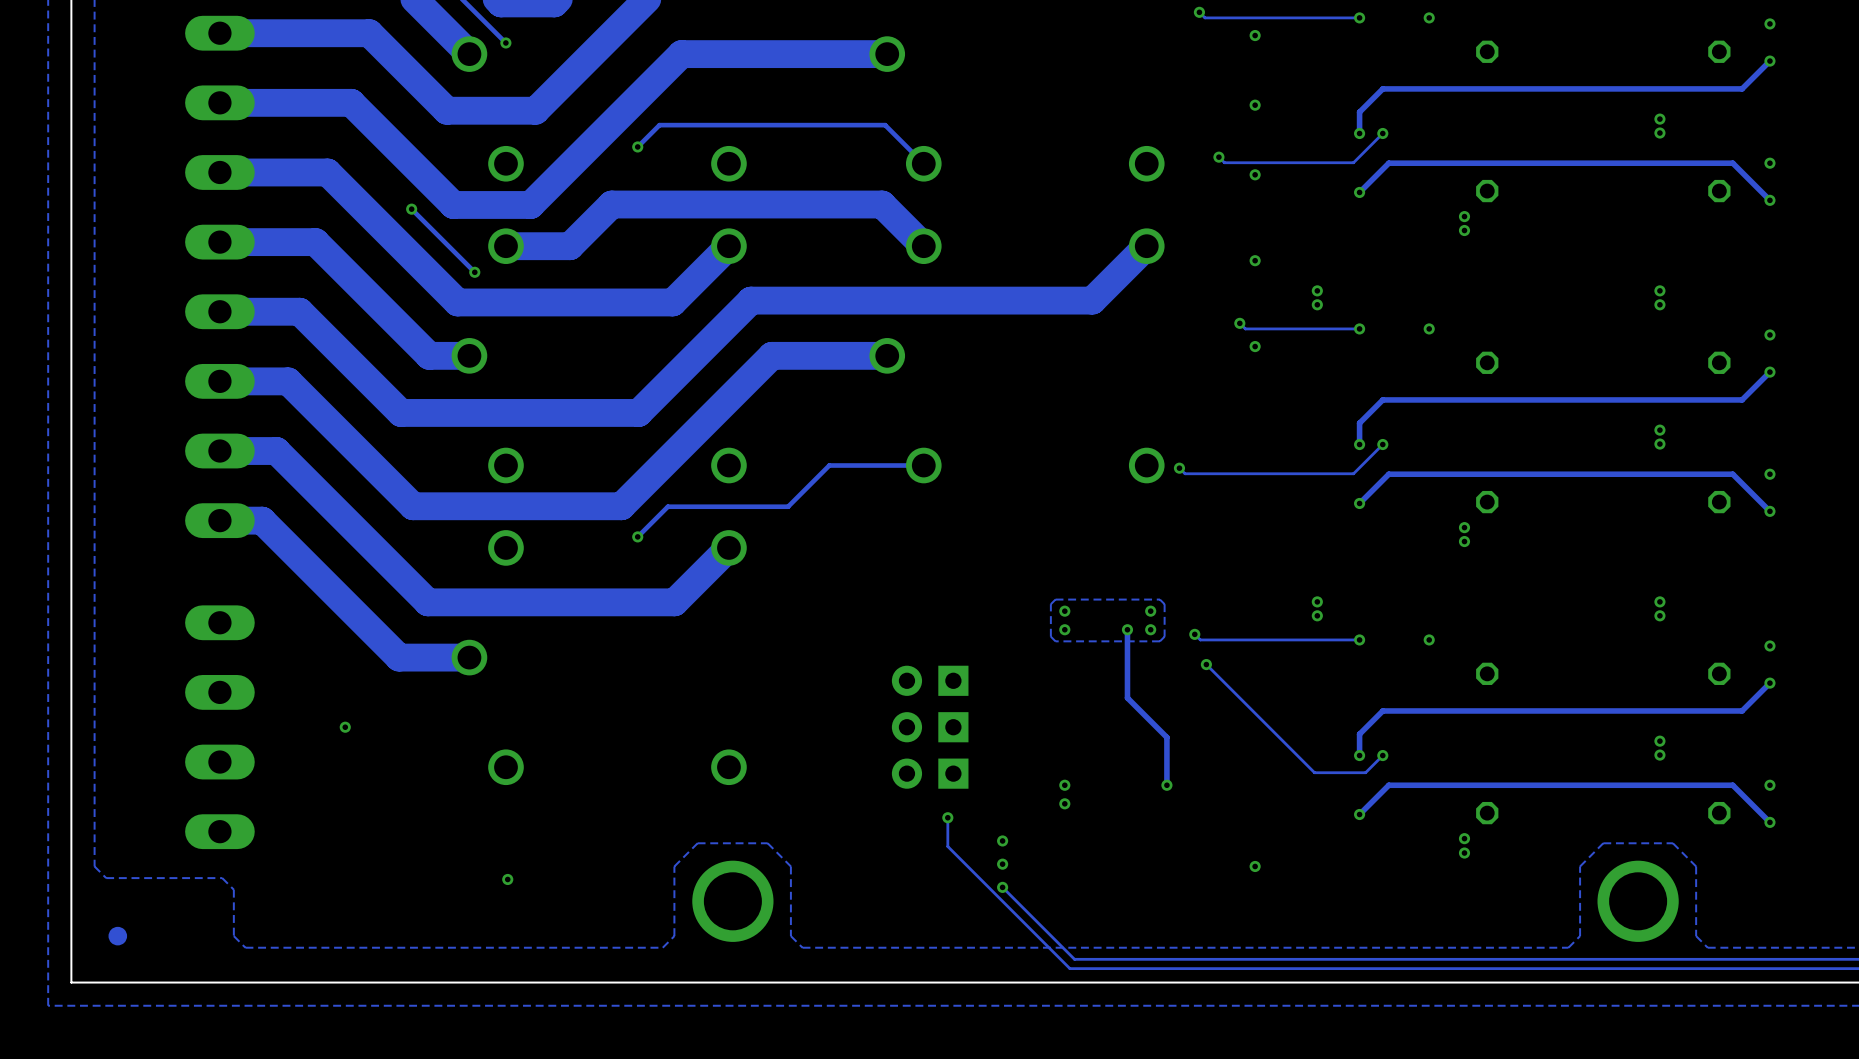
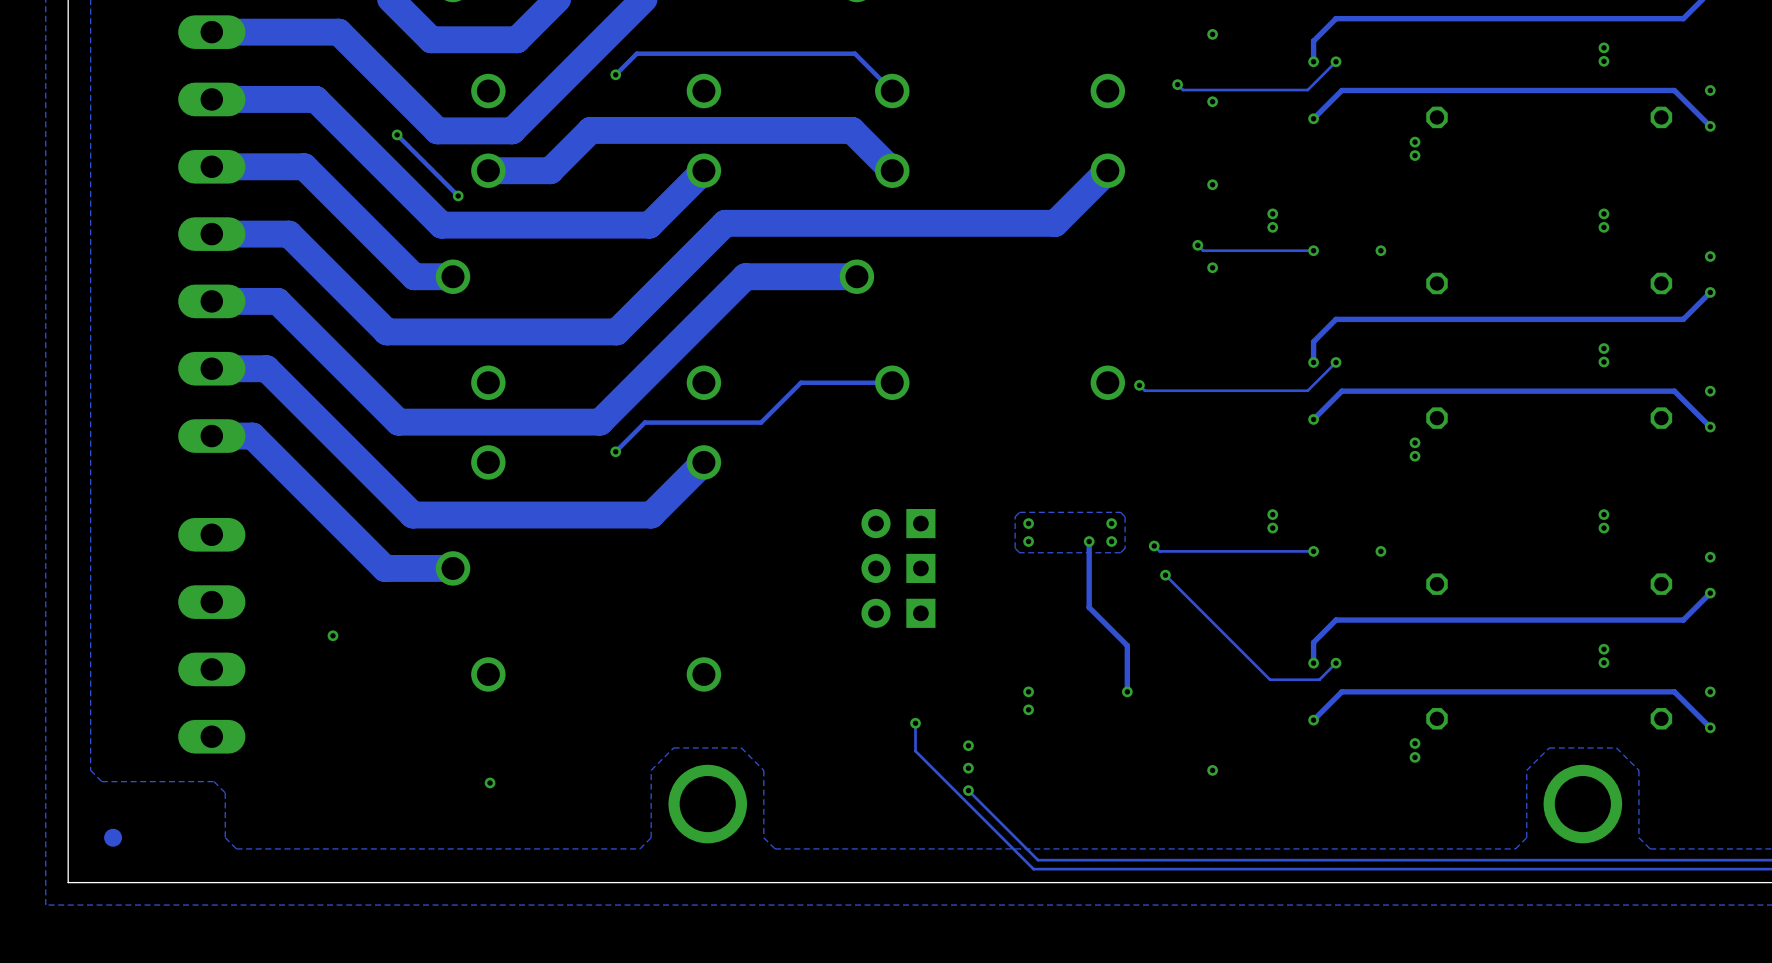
part: none -> (898, 523)
part: none -> (898, 568)
part: (930, 680) -> none
part: none -> (898, 613)
part: (930, 727) -> none
part: (930, 773) -> none

